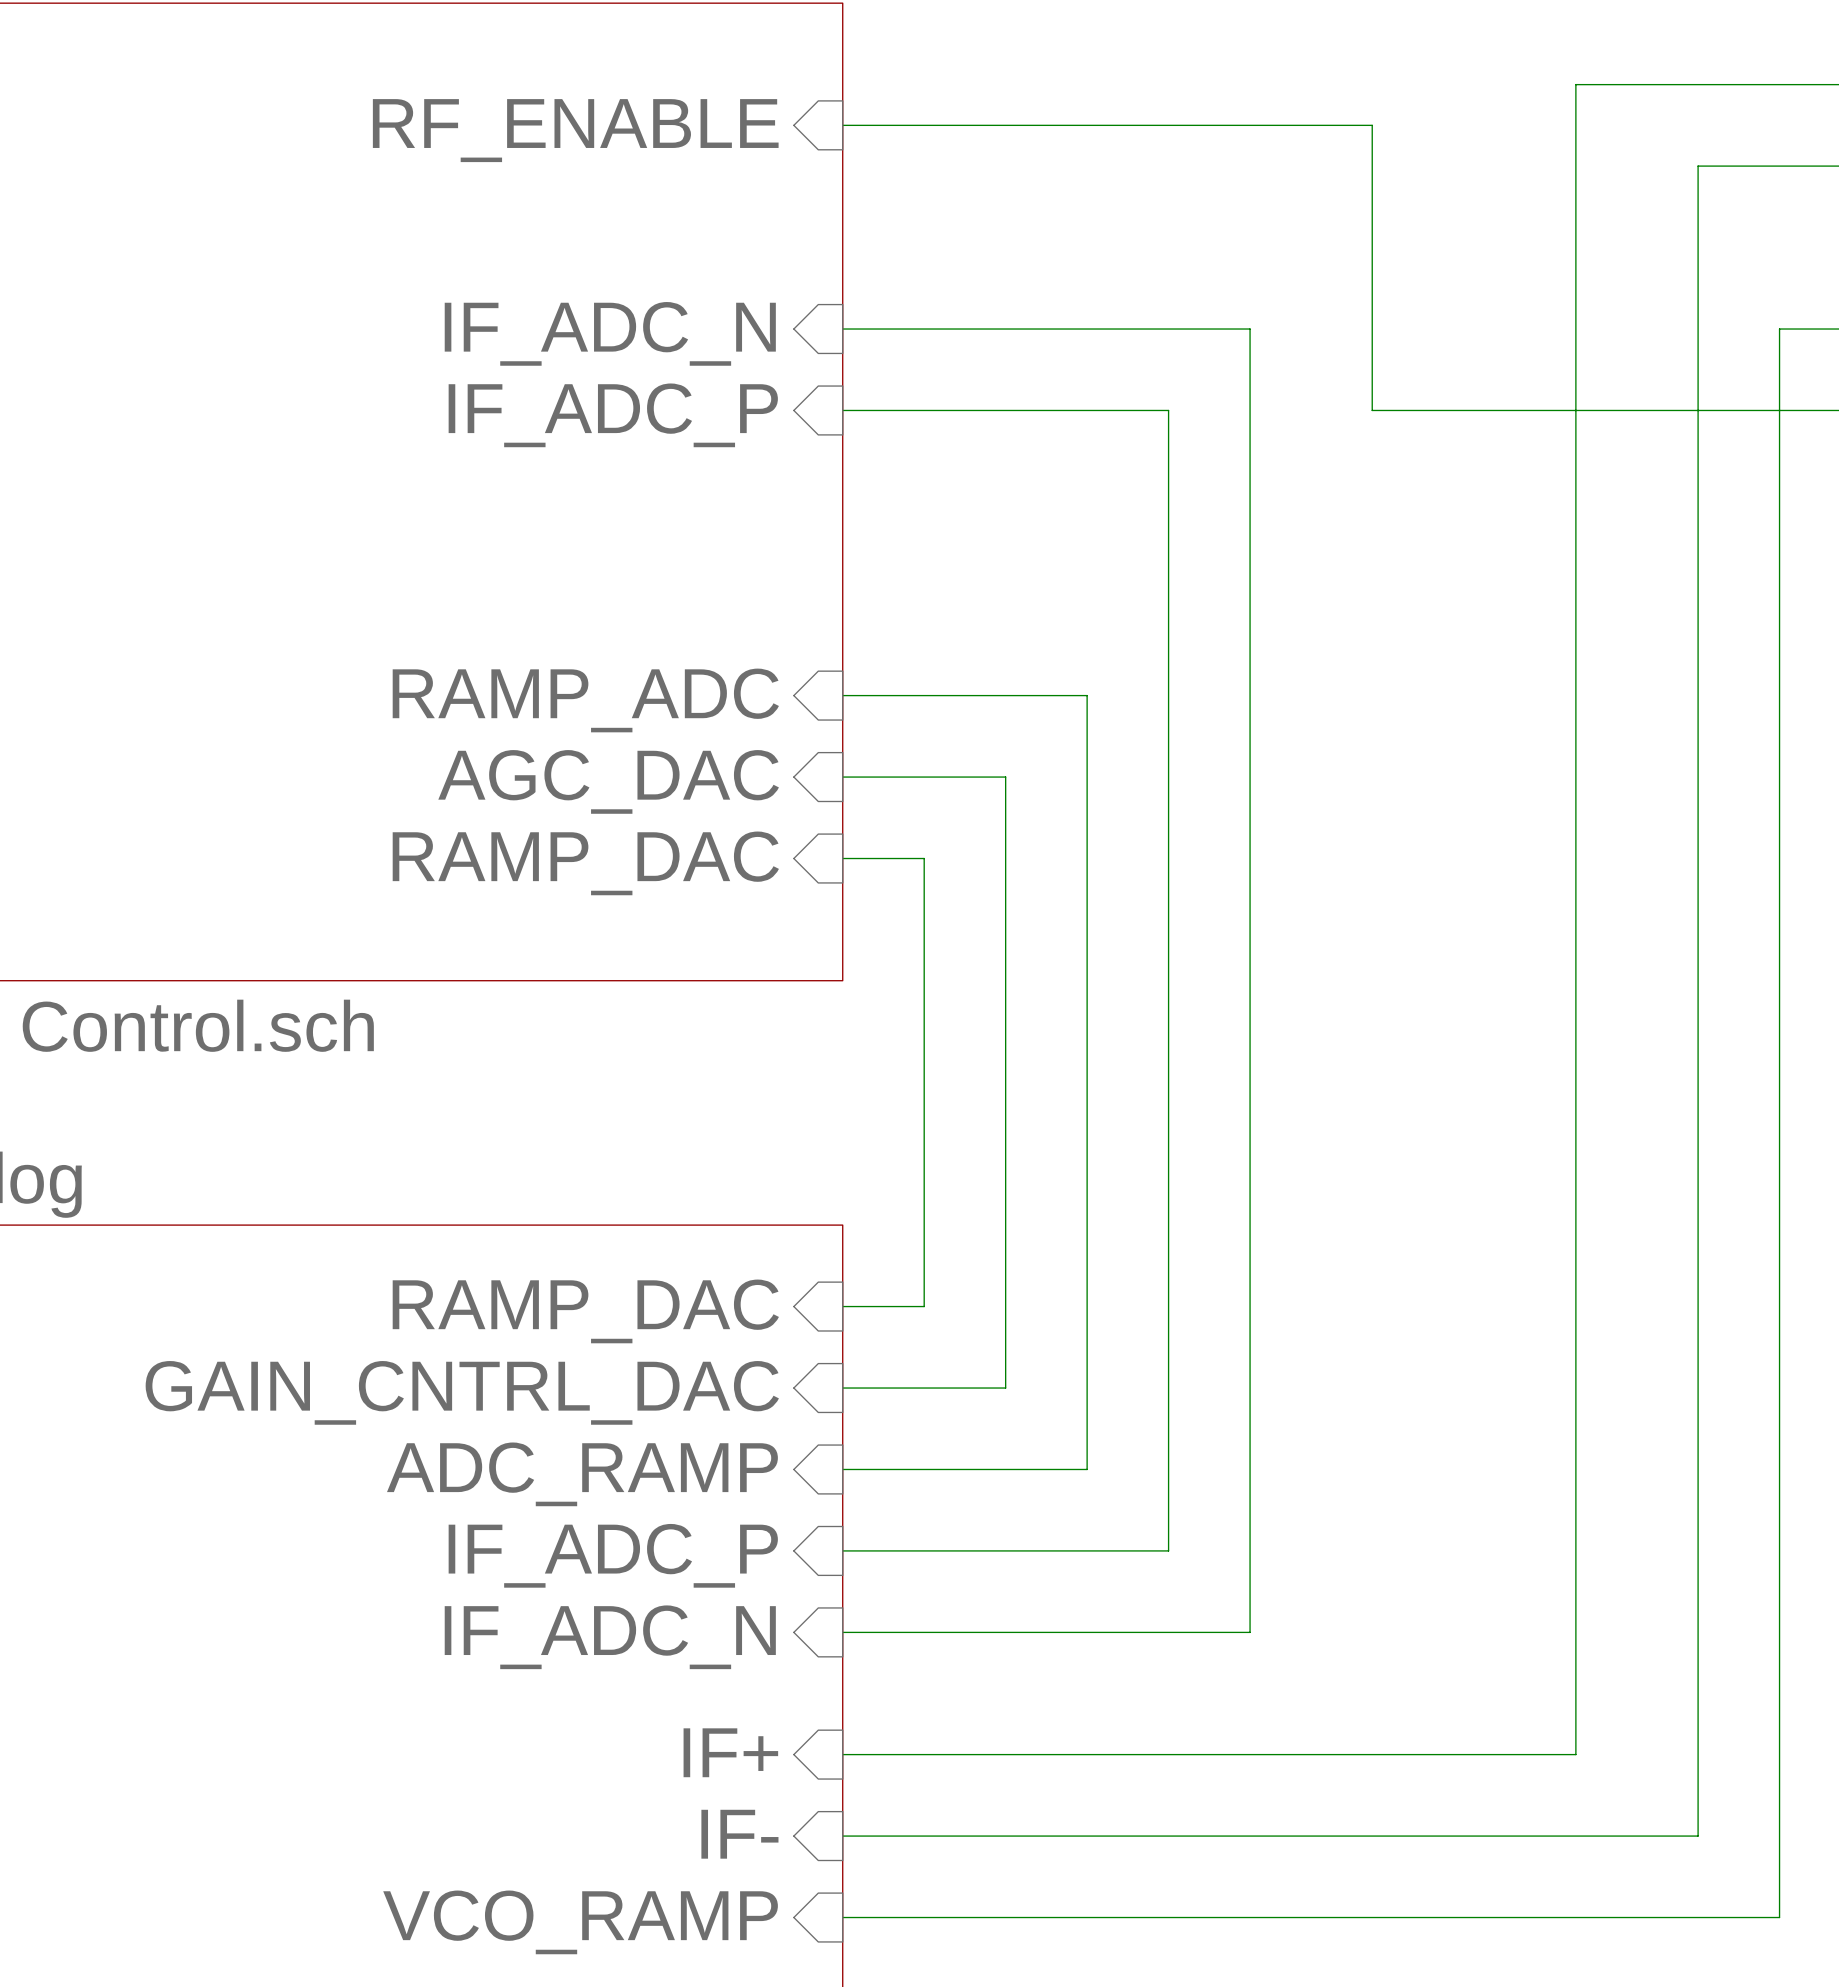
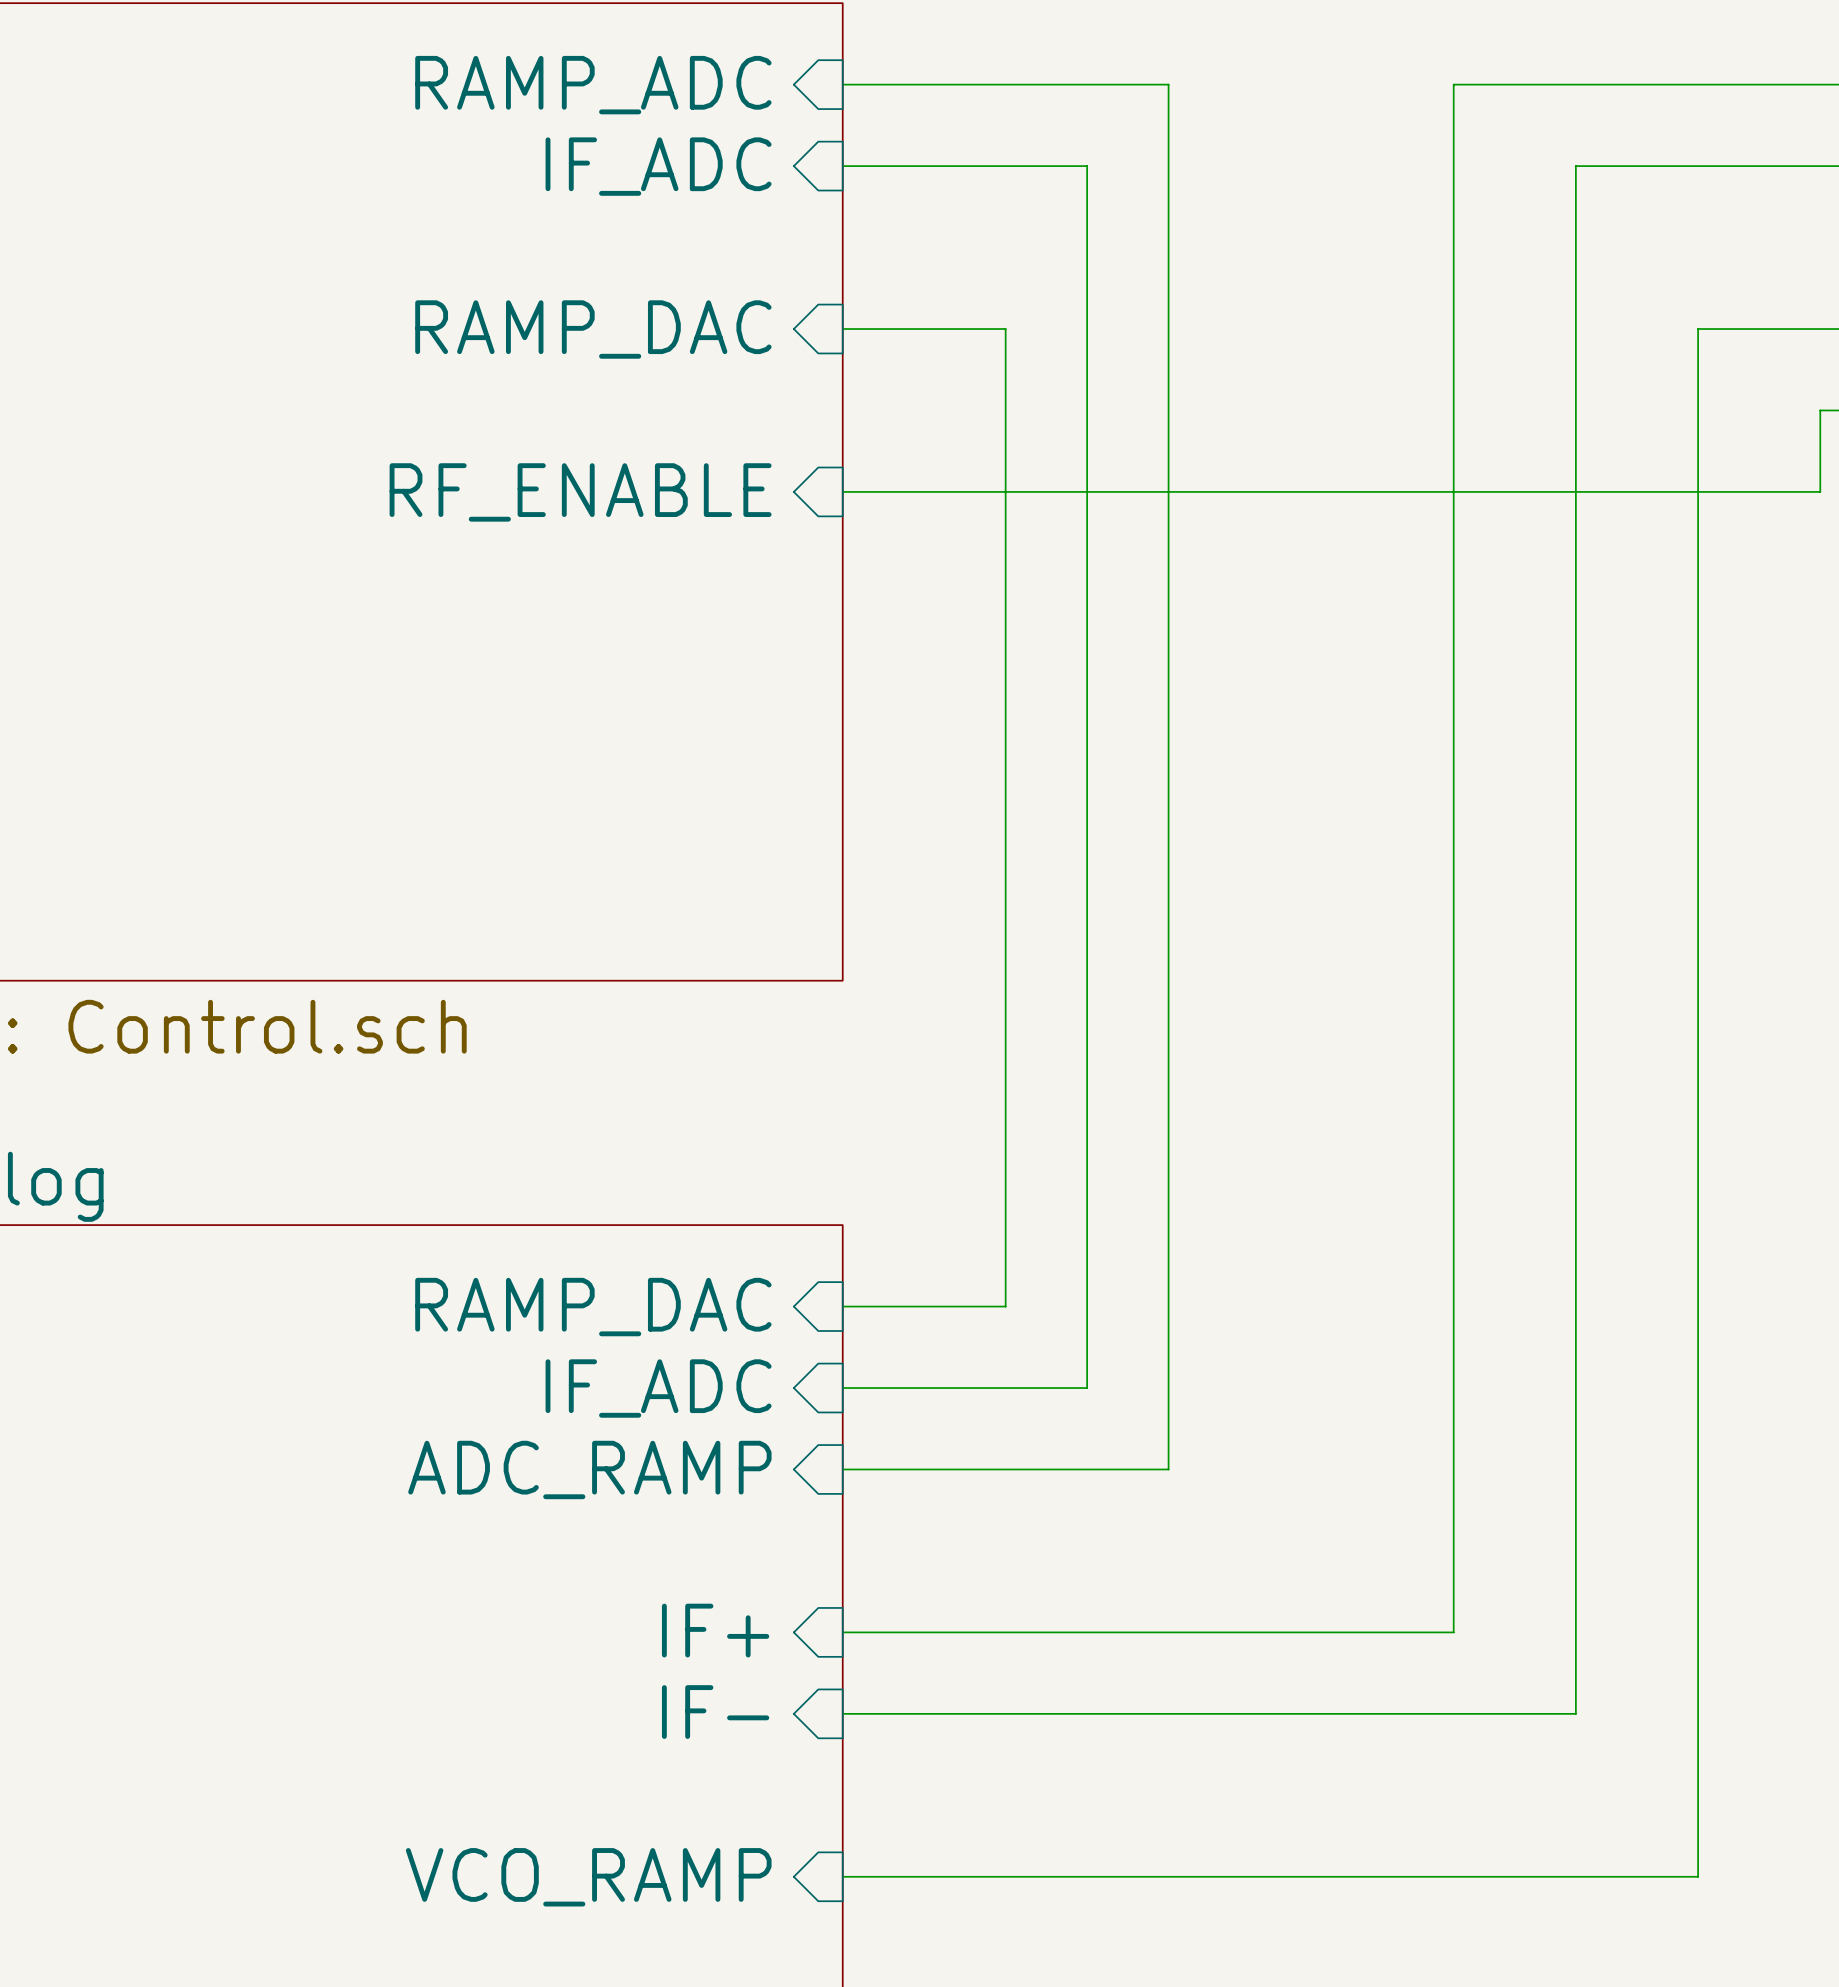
wire: (1575, 84) (1575, 166) -> (1698, 166) (1575, 166)
wire: (842, 125) (1372, 125) (1372, 410) (1820, 410) -> (842, 491) (1820, 491) (1820, 410)
sheet pin position: RF_ENABLE (575, 130) -> RF_ENABLE (580, 492)
wire: (1698, 166) (1698, 329) -> (1779, 329) (1698, 329)
sheet pin: none -> IF_ADC (658, 166)
wire: (1005, 329) (1250, 329) (1250, 1632) -> (1575, 84) (1453, 84) (1453, 1632) (1250, 1632)
wire: (1779, 329) (1779, 1917) (842, 1917) -> none
sheet pin: IF_ADC_N (610, 333) -> RAMP_DAC (593, 329)
wire: (842, 410) (1168, 410) -> (842, 84) (1168, 84) (1168, 410)
sheet pin: IF_ADC_P (613, 415) -> none
wire: (842, 695) (1087, 695) -> (842, 166) (1087, 166) (1087, 695)
sheet pin position: RAMP_ADC (585, 700) -> RAMP_ADC (593, 85)
wire: (842, 777) (1005, 777) -> (1005, 329) (1005, 777)
sheet pin: AGC_DAC (608, 781) -> none
wire: (842, 858) (924, 858) (924, 1306) -> none
sheet pin: RAMP_DAC (585, 863) -> none
wire: (1005, 1306) (1005, 1388) -> (1005, 1306) (924, 1306)
wire: none -> (1005, 1388) (1087, 1388)
wire: (1087, 1388) (1087, 1469) -> (1168, 1469) (1087, 1469)
sheet pin: GAIN_CNTRL_DAC (462, 1392) -> IF_ADC (658, 1388)
wire: (1168, 1469) (1168, 1550) (842, 1550) -> none
sheet pin: IF_ADC_P (613, 1555) -> none
sheet pin: IF_ADC_N (610, 1637) -> IF+ (715, 1630)
wire: (1575, 1713) (1575, 1754) (842, 1754) -> (1575, 1713) (842, 1713)
sheet pin: IF+ (730, 1752) -> none
sheet pin position: IF- (739, 1834) -> IF- (715, 1712)
wire: (842, 1836) (1698, 1836) -> (842, 1876) (1698, 1876) (1698, 1836)
sheet pin position: VCO_RAMP (580, 1922) -> VCO_RAMP (588, 1877)

